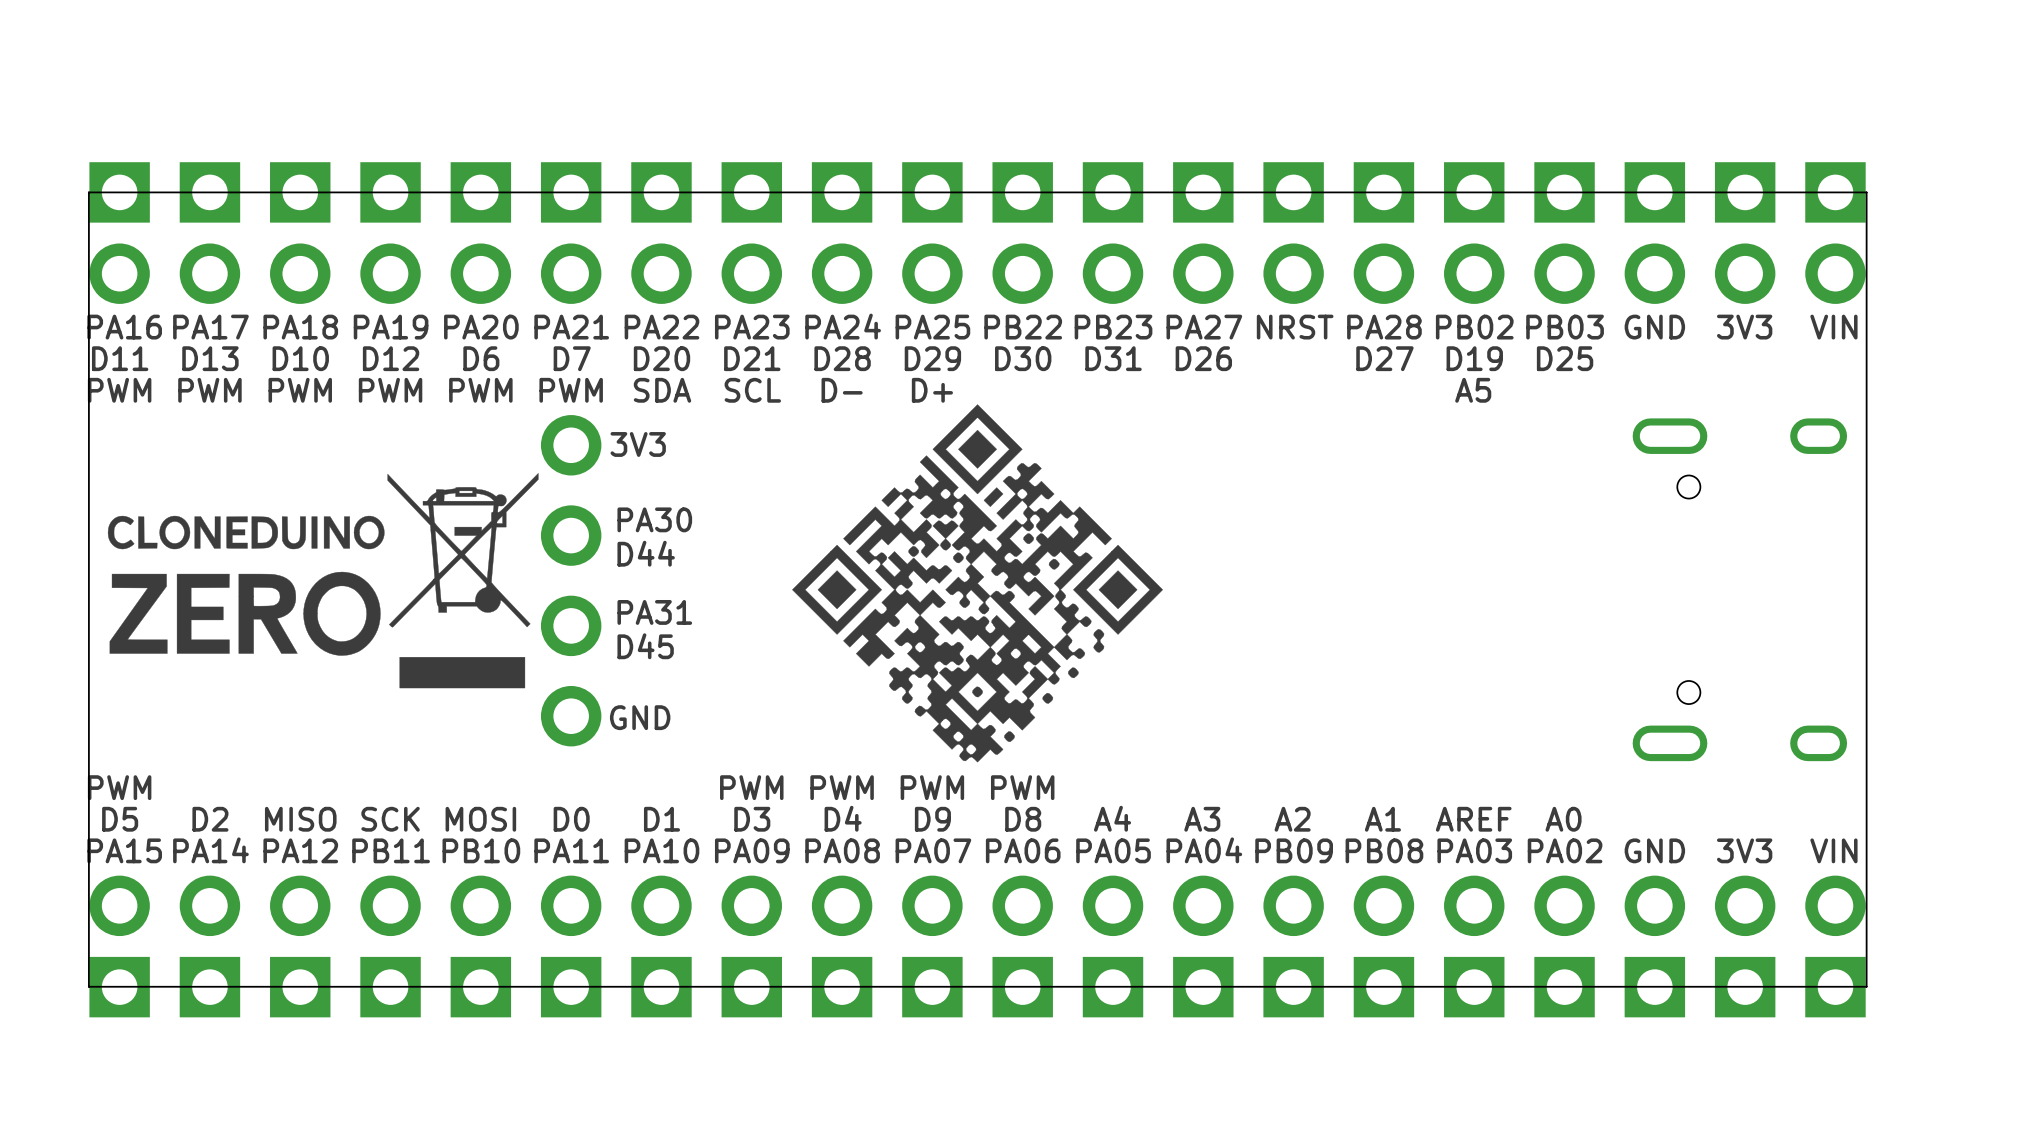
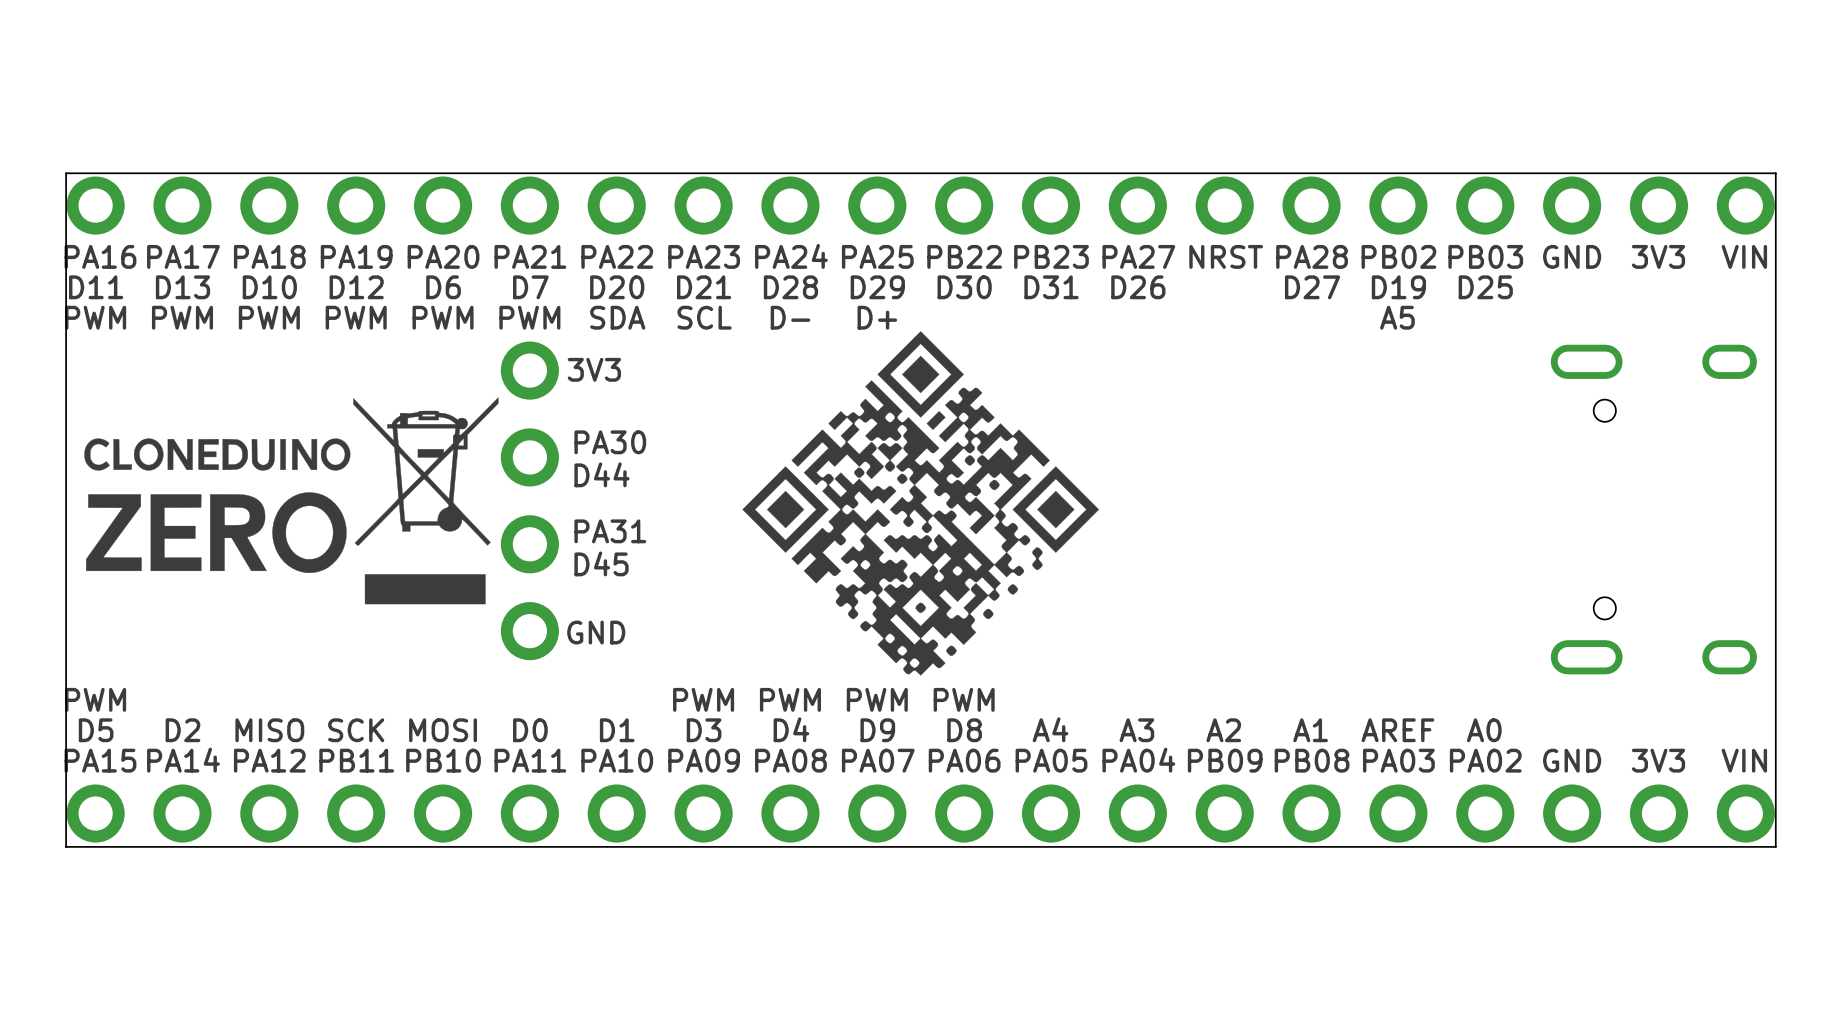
part: (977, 192) -> none
board edge: (1866, 240) (1866, 192) (88, 192) (88, 240) -> (1775, 173) (66, 173)
board edge: (1866, 940) (1866, 986) (88, 986) (88, 940) -> (1775, 846) (66, 846)
part: (977, 987) -> none

